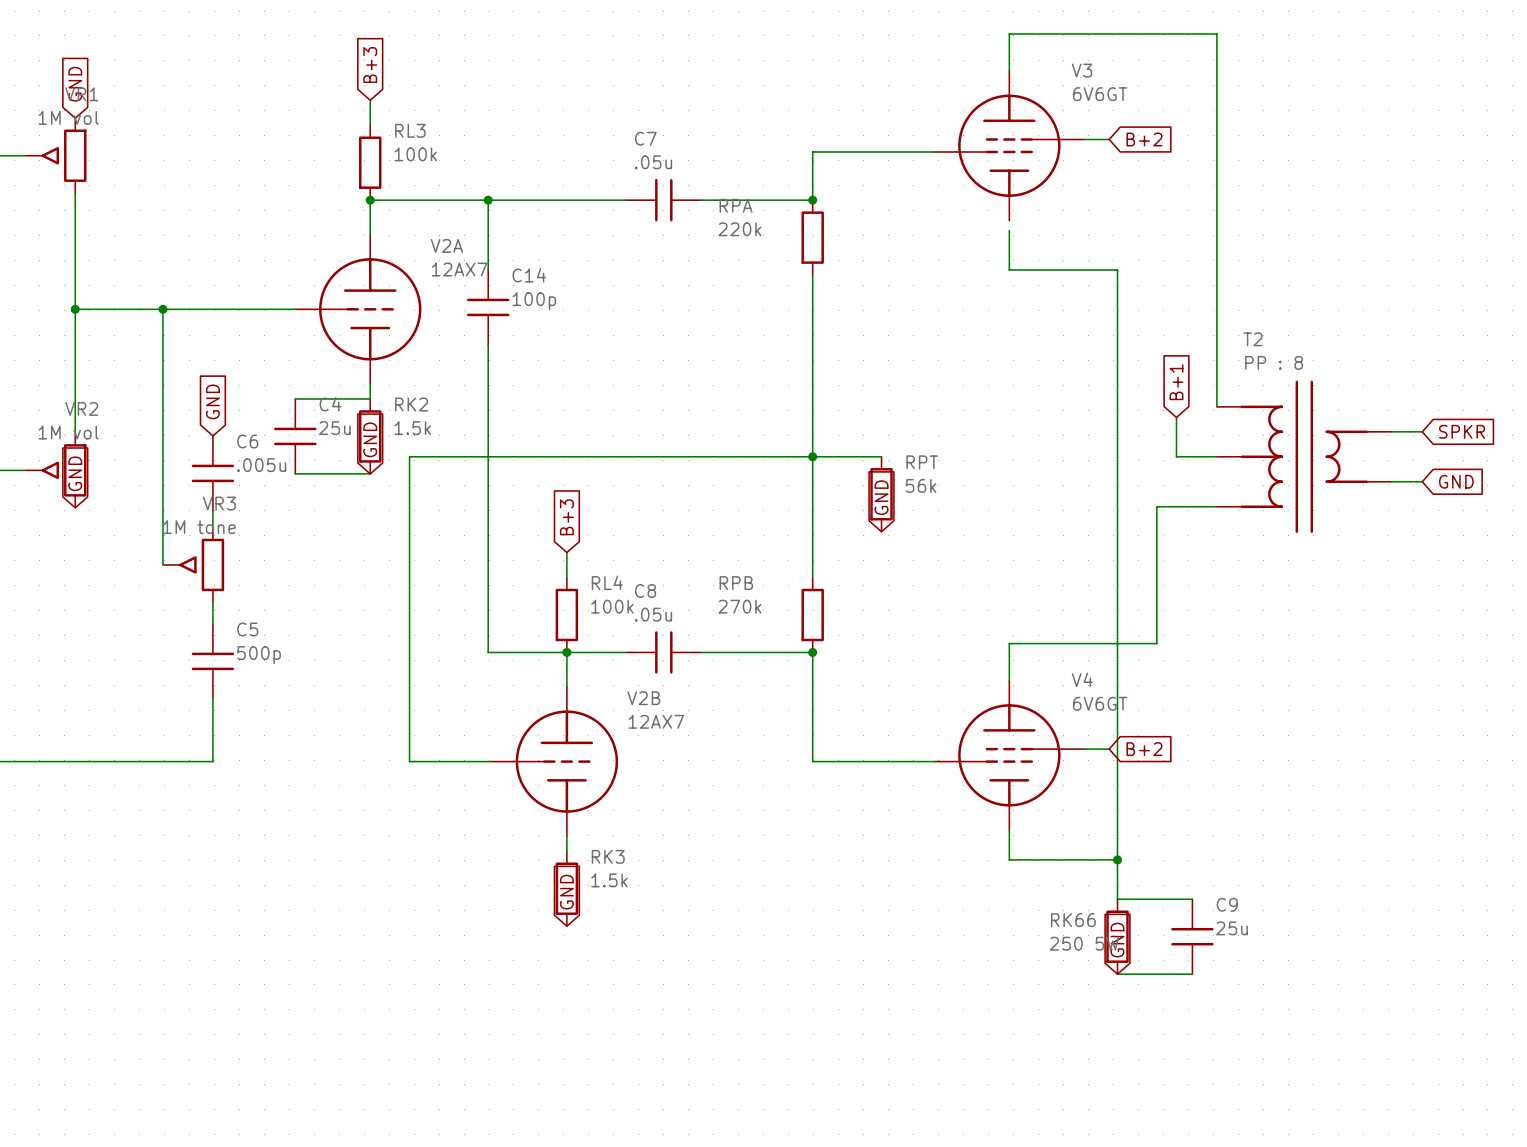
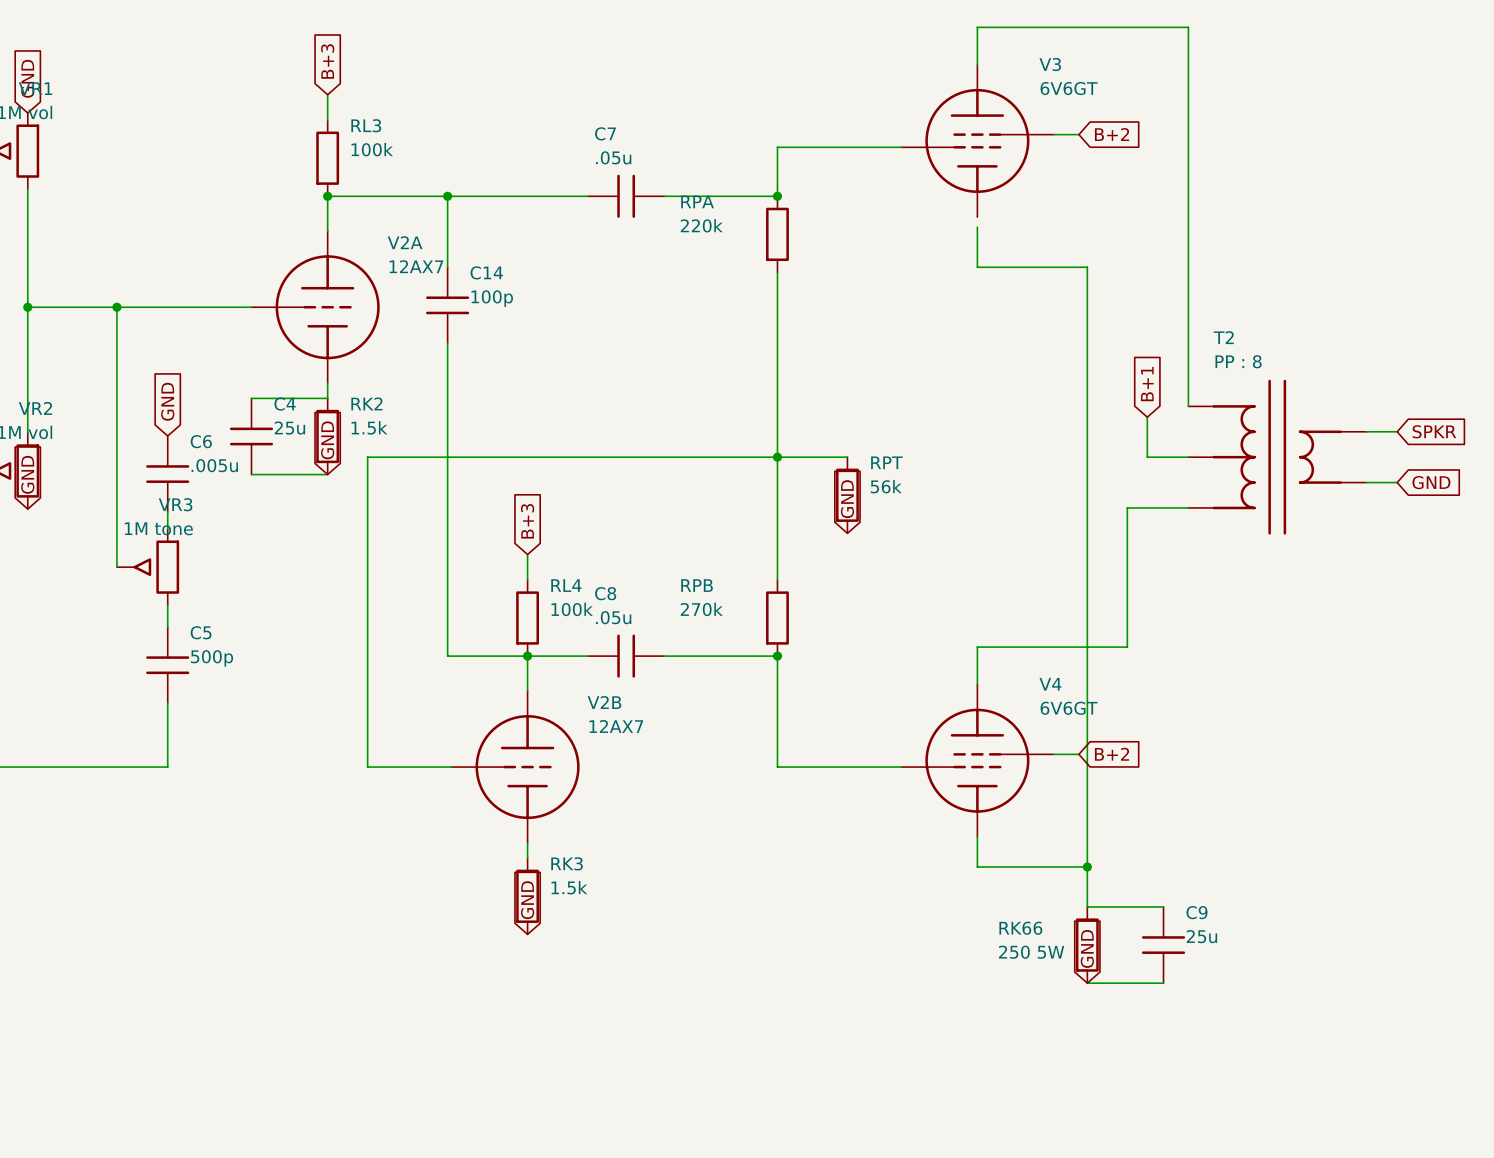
RK66 name position: RK66 (1073, 920) -> RK66 (1020, 928)
RK66 value position: 250 5W (1084, 943) -> 250 5W (1031, 952)

